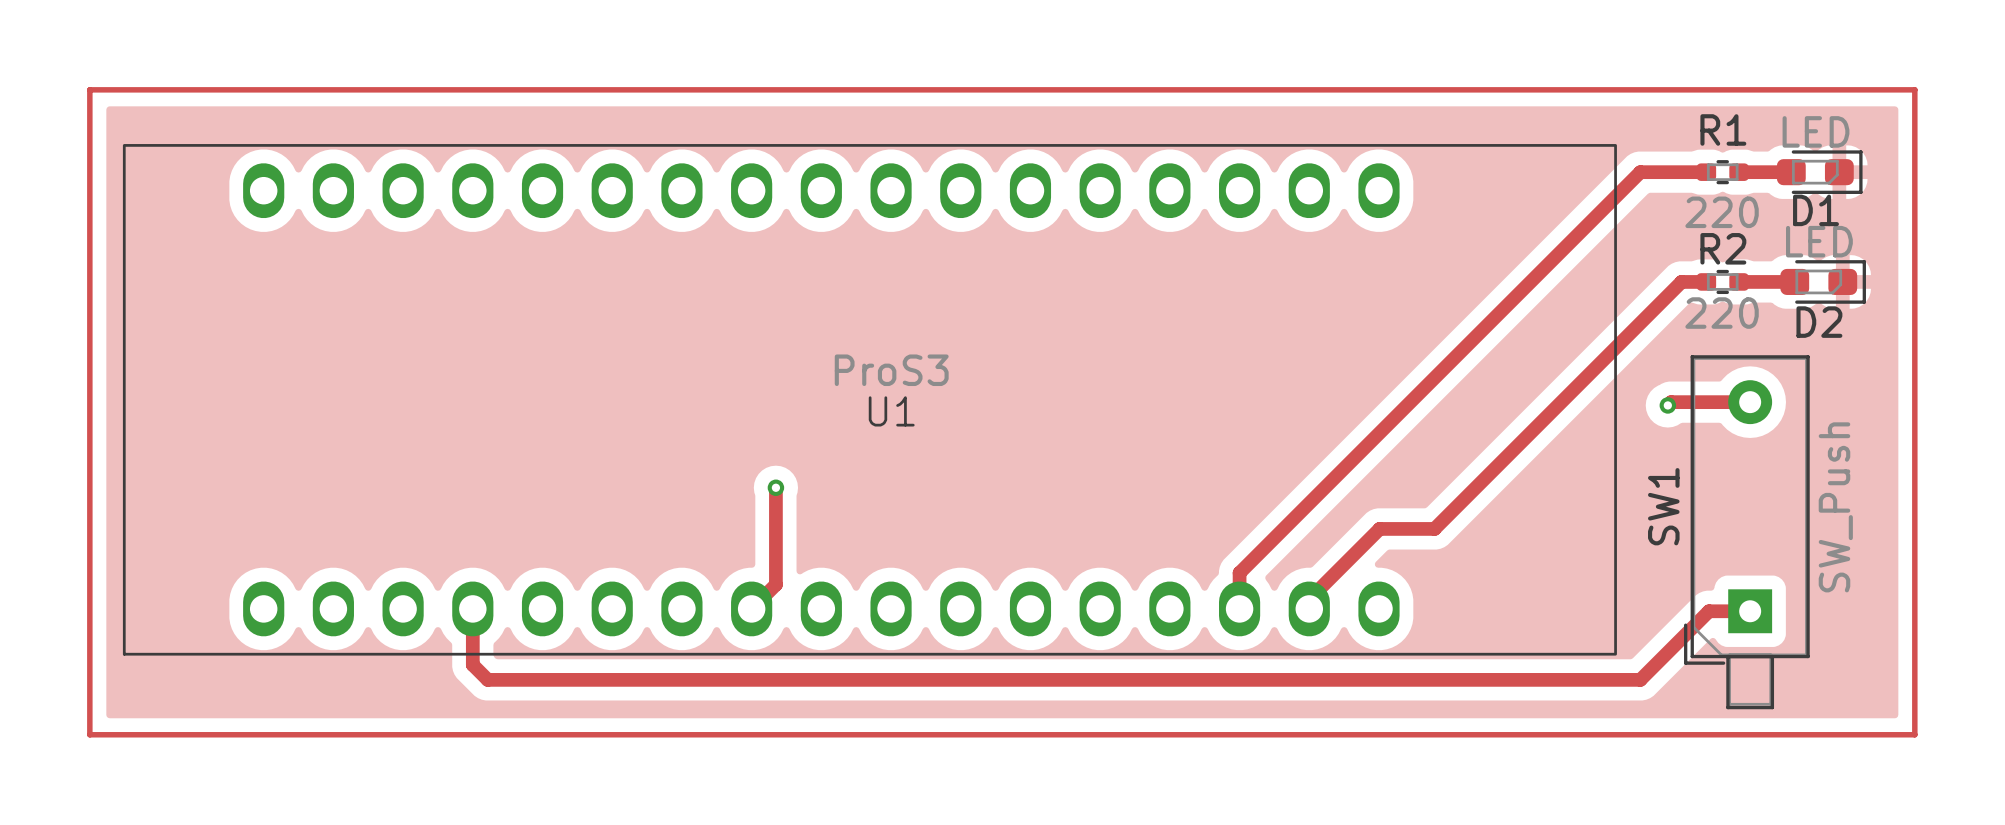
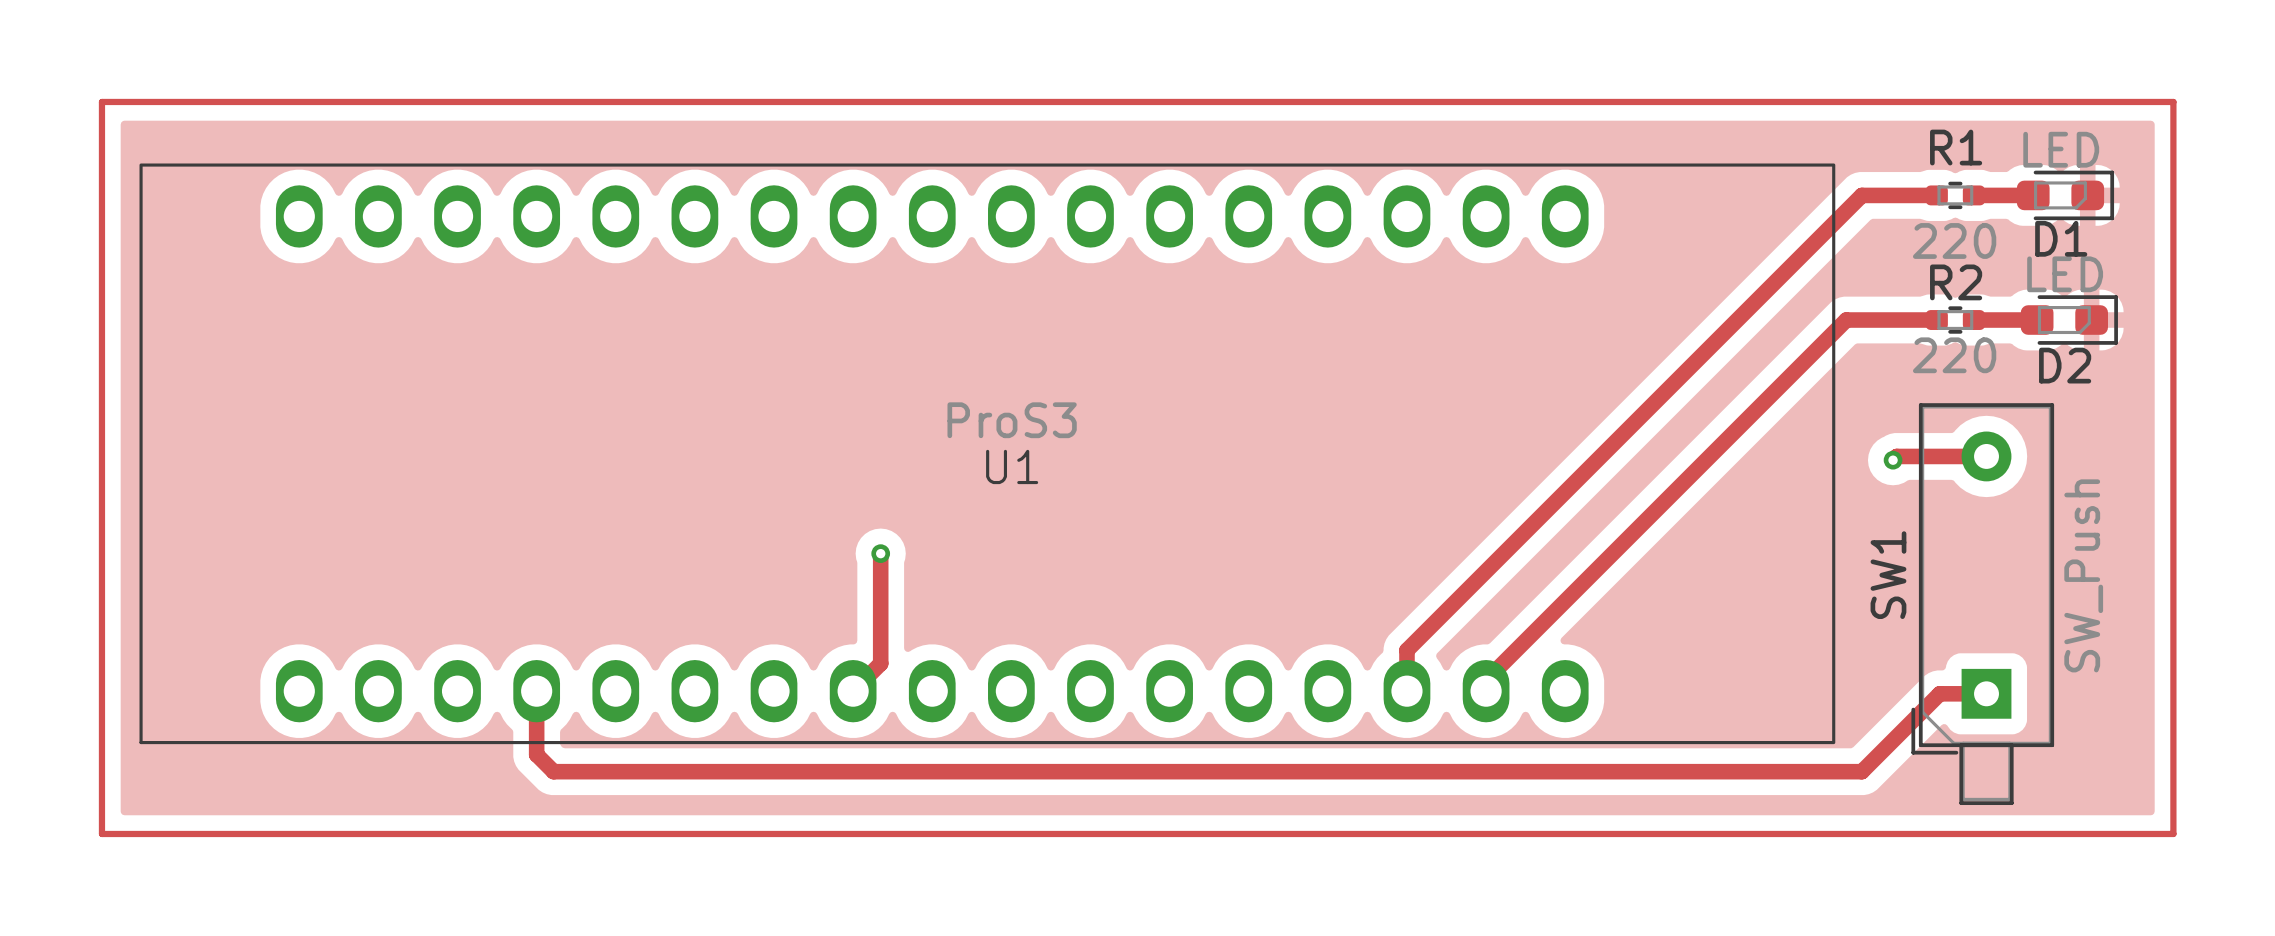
track: (1681, 281) (1434, 528) (1379, 528) -> (1908, 320) (1846, 320) (1565, 600)

